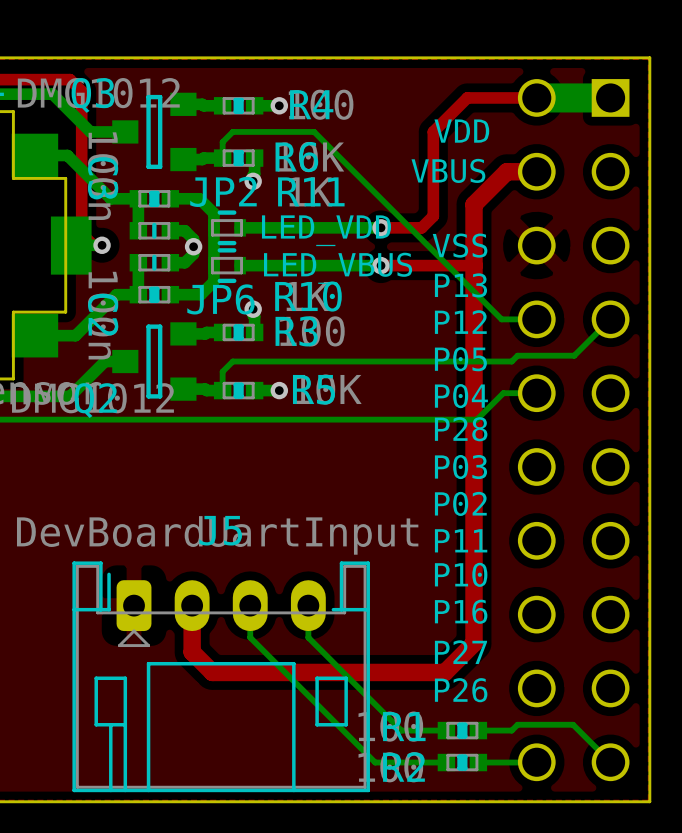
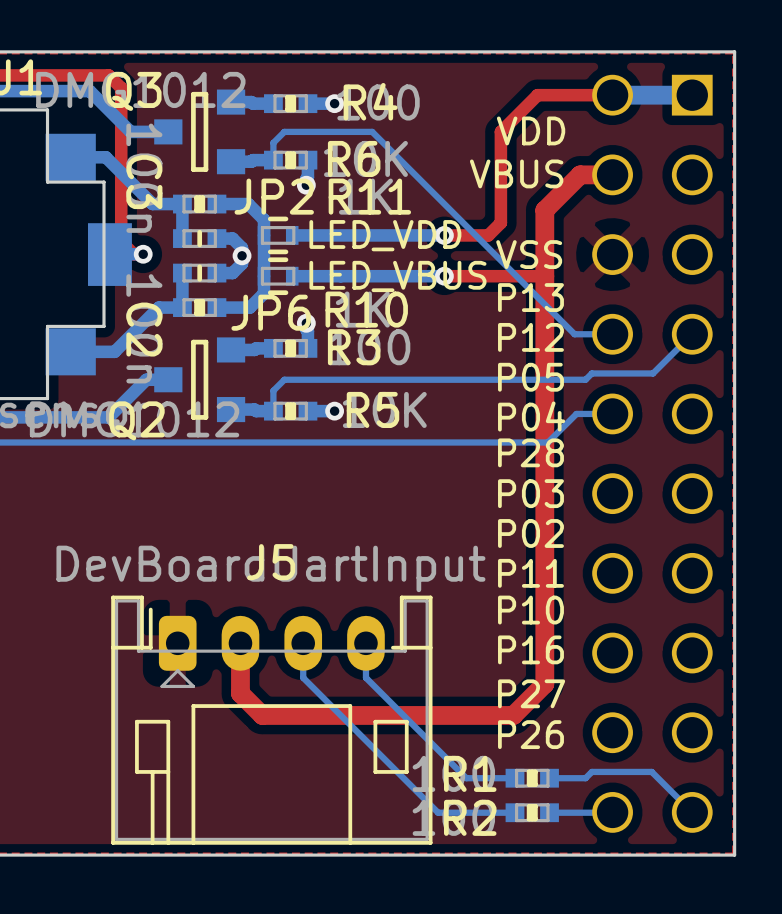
bottom track width: thick (610, 97) (536, 97) -> thin (692, 95) (612, 95)

